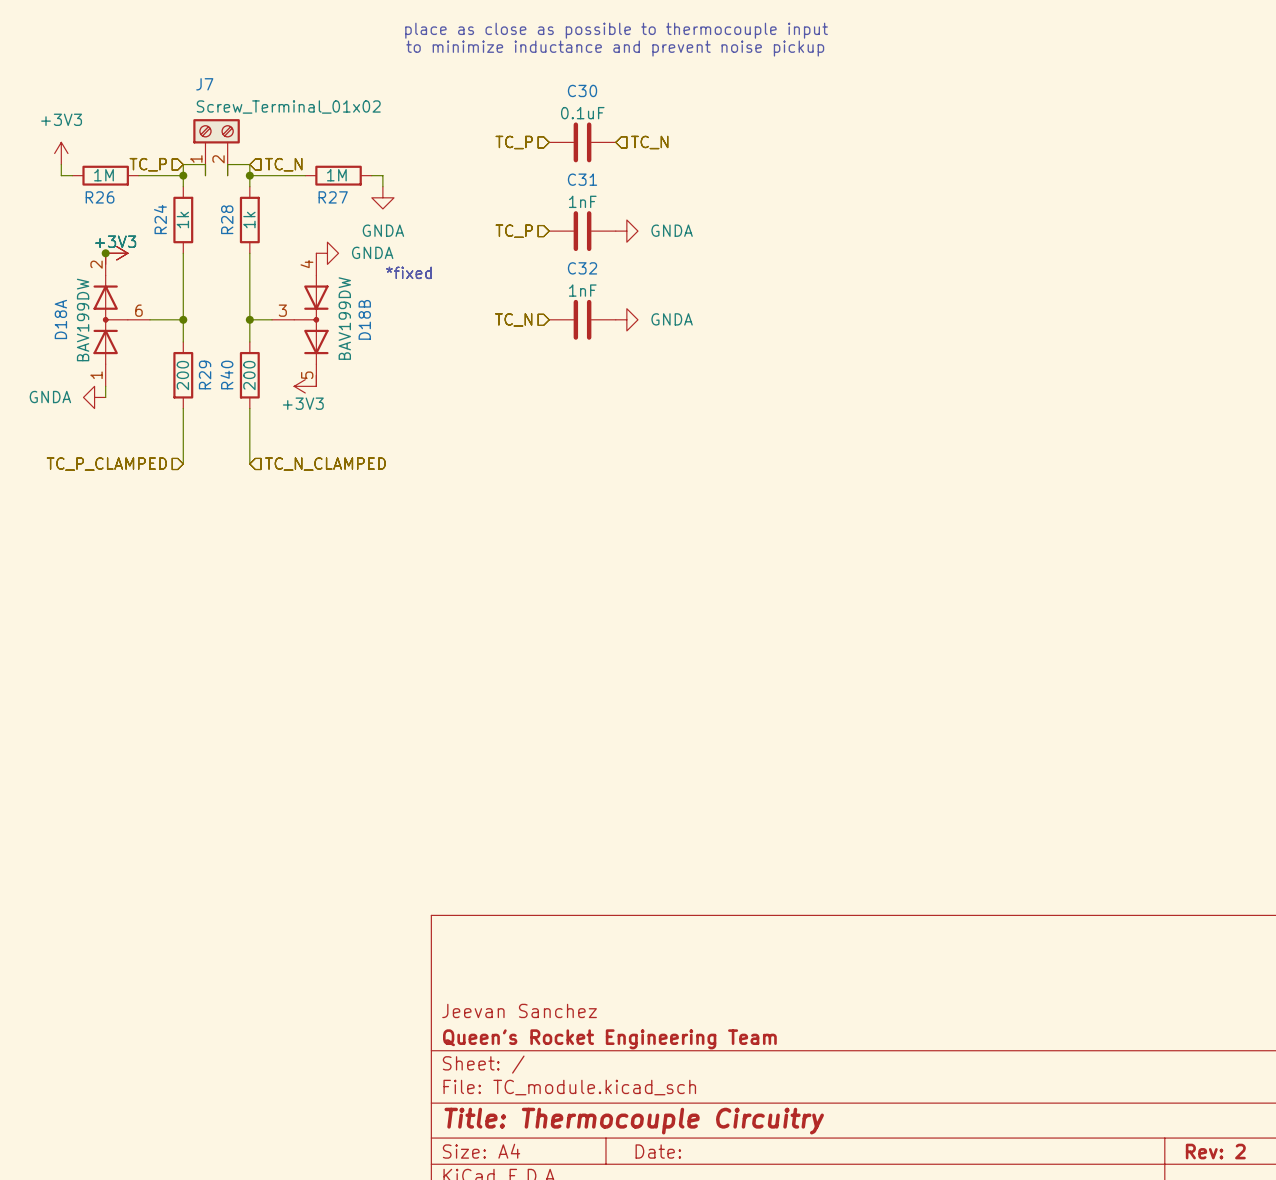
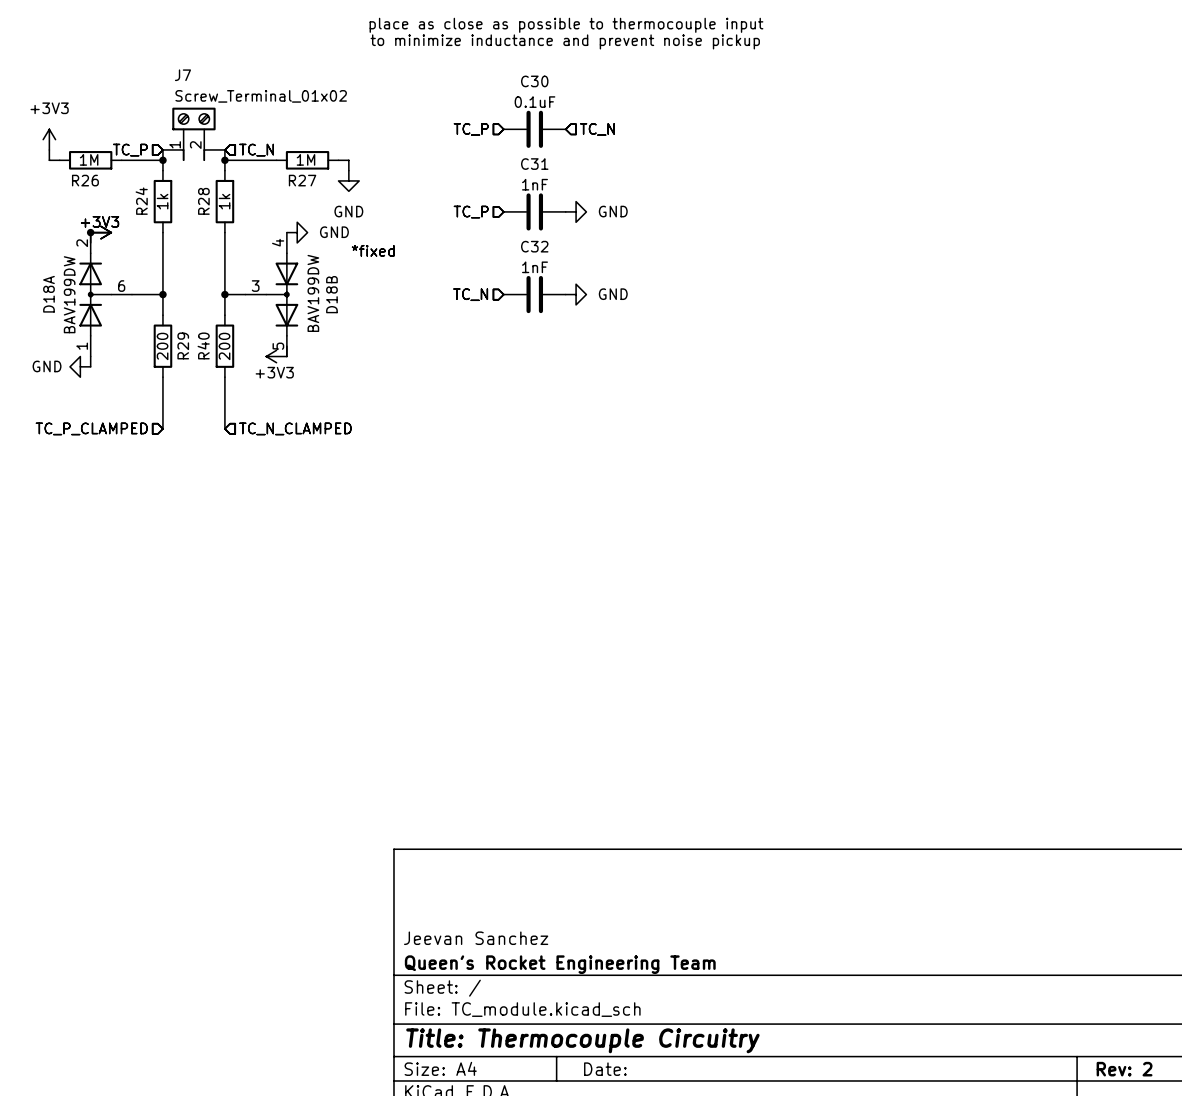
power symbol: GNDA (382, 197) -> GND (348, 180)
power symbol: GNDA (626, 231) -> GND (576, 211)
power symbol: GNDA (327, 253) -> GND (297, 232)
power symbol: GNDA (626, 319) -> GND (576, 294)
power symbol: GNDA (94, 397) -> GND (80, 366)

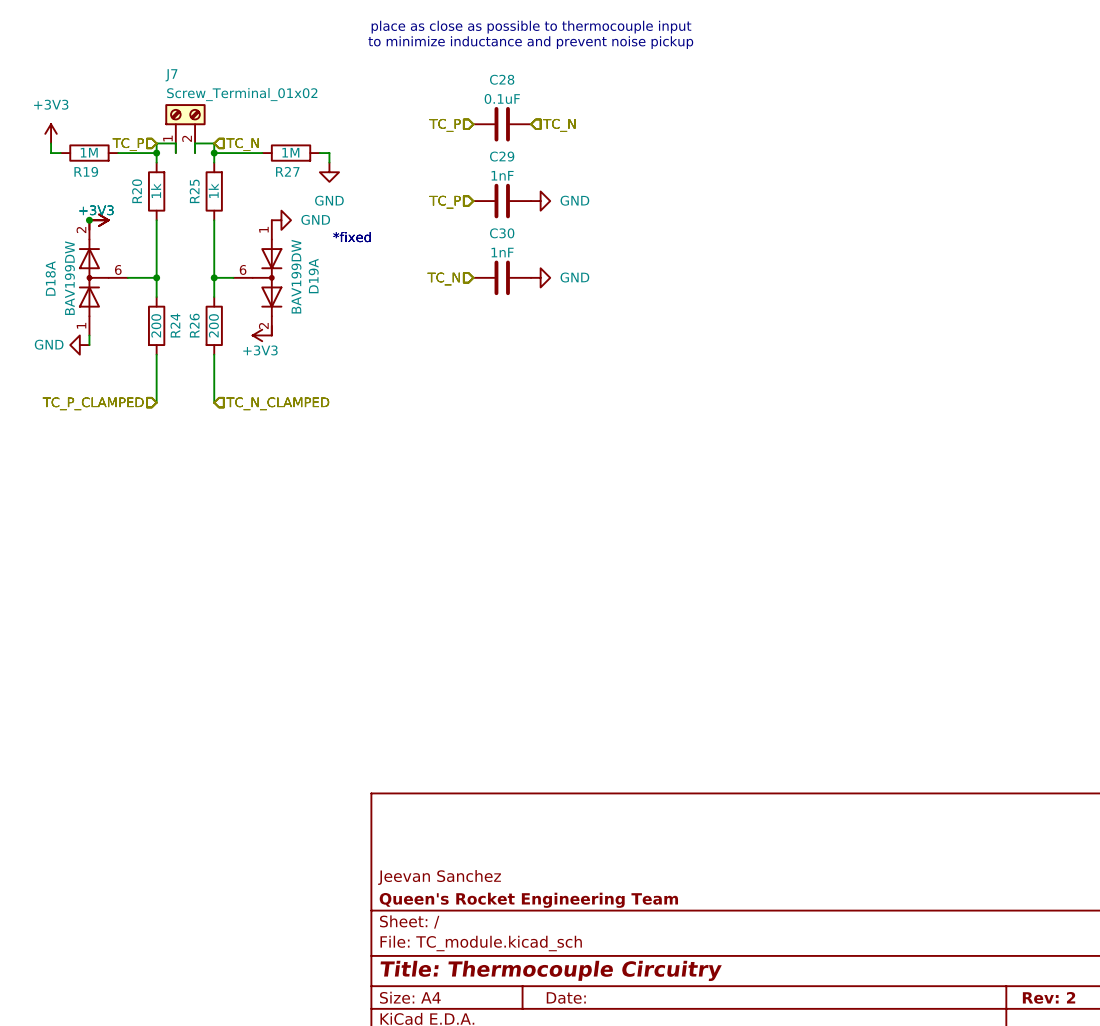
C30 name: C30 (534, 81) -> C28 (502, 79)
C31 name: C31 (534, 164) -> C29 (502, 156)
R26 name: R26 (85, 180) -> R19 (86, 171)
R24 name: R24 (141, 201) -> R20 (137, 191)
R28 name: R28 (203, 201) -> R25 (194, 191)
D18B pin number: 4 (278, 242) -> 1 (263, 229)
C32 name: C32 (534, 246) -> C30 (502, 233)
D18B pin number: 3 (255, 286) -> 6 (243, 269)
D18B name: D18B (331, 294) -> D19A (313, 276)
R29 name: R29 (183, 345) -> R24 (175, 325)
R40 name: R40 (203, 345) -> R26 (194, 325)
D18B pin number: 5 (278, 346) -> 2 (263, 326)

